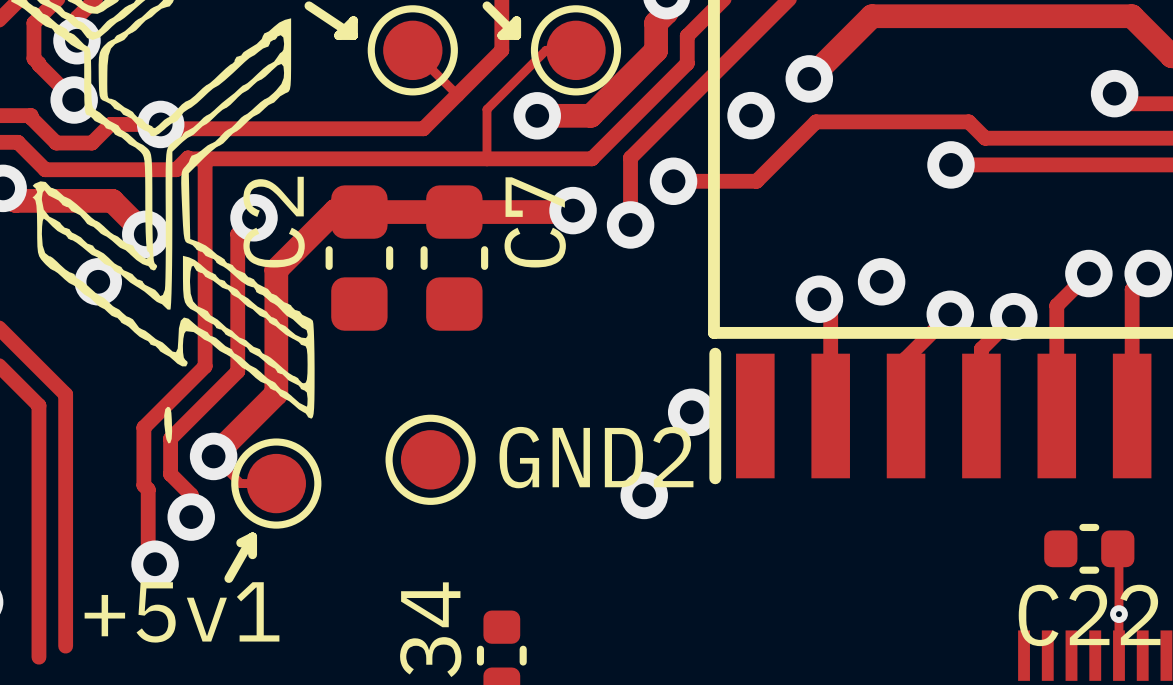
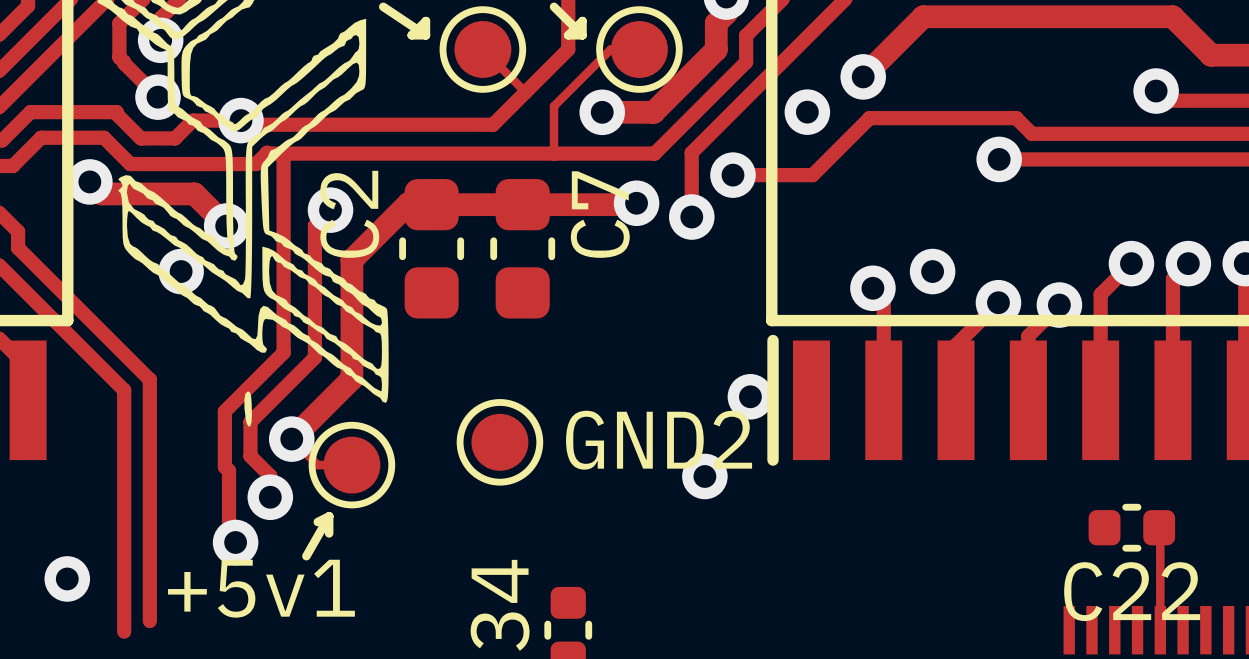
via: (1118, 614) -> none

